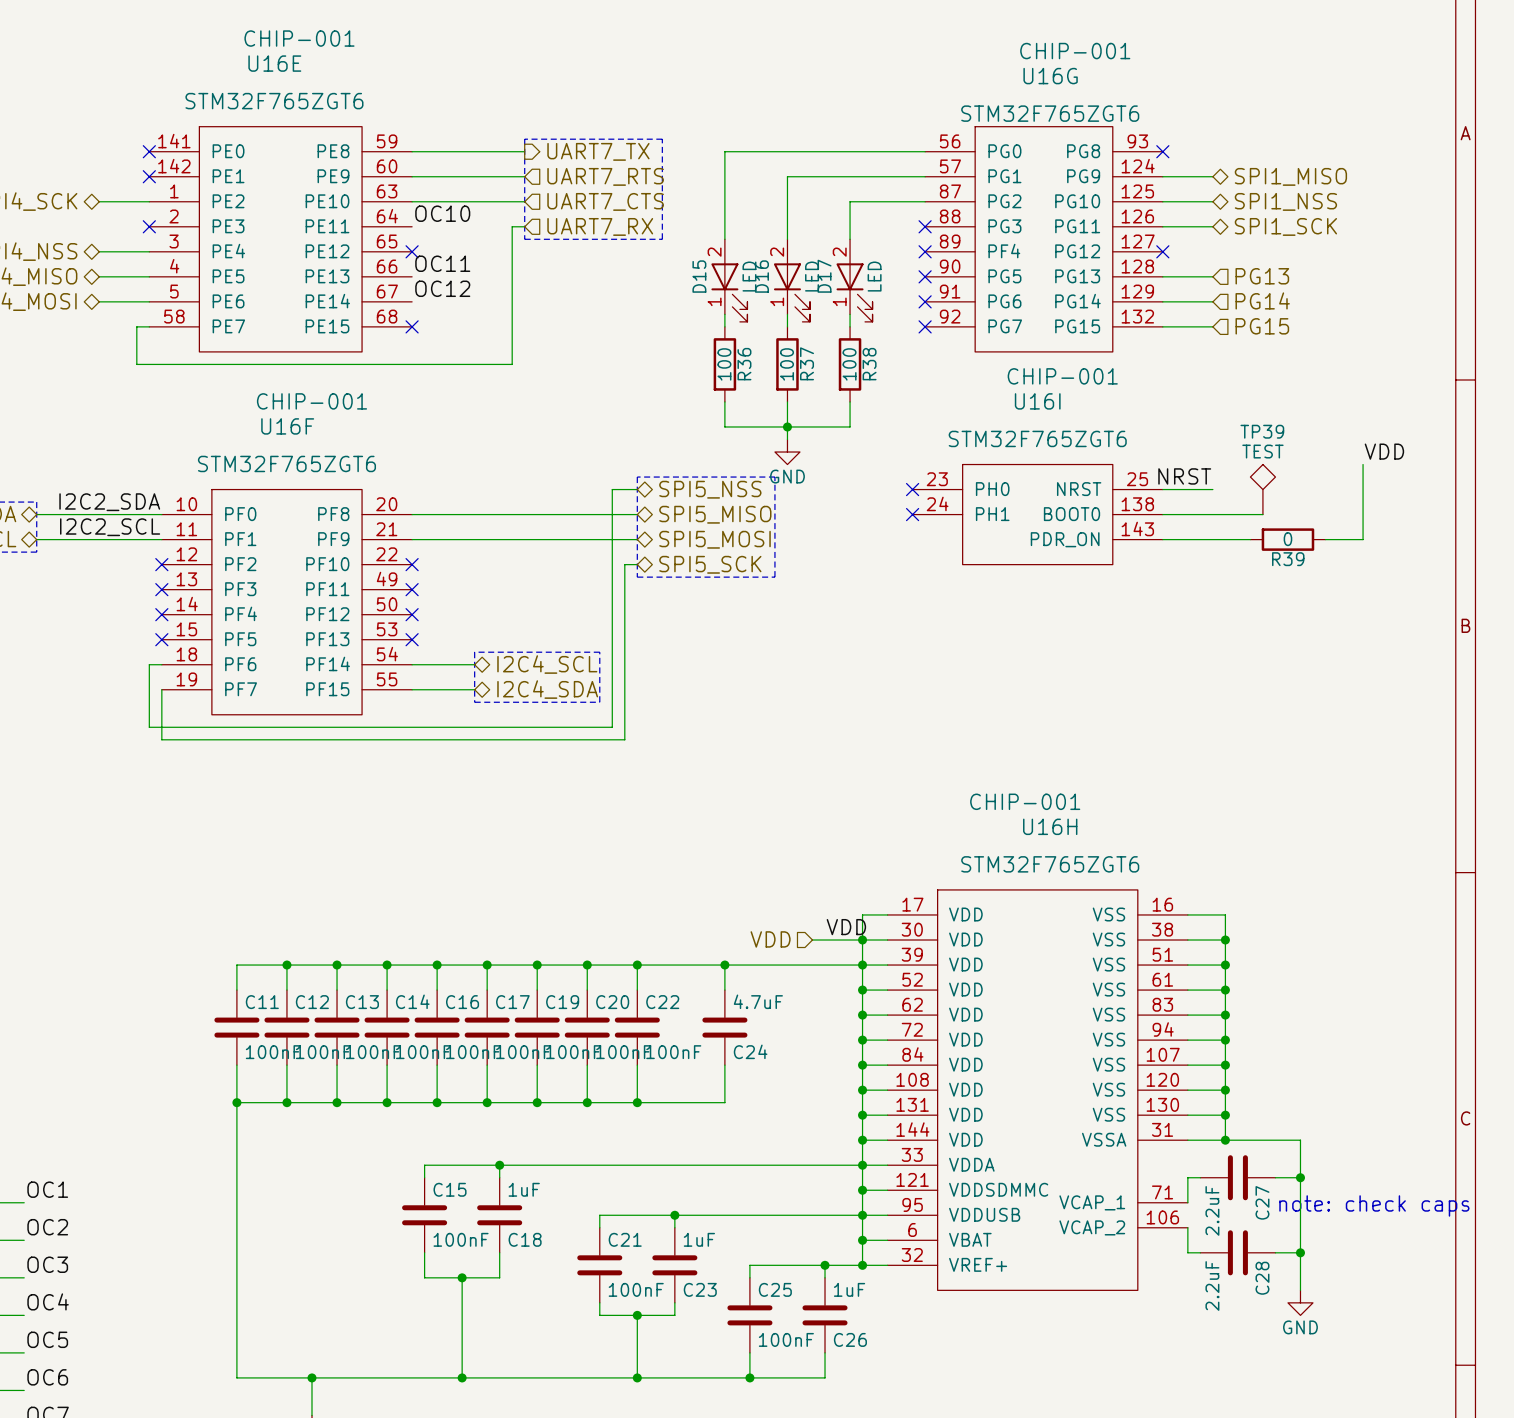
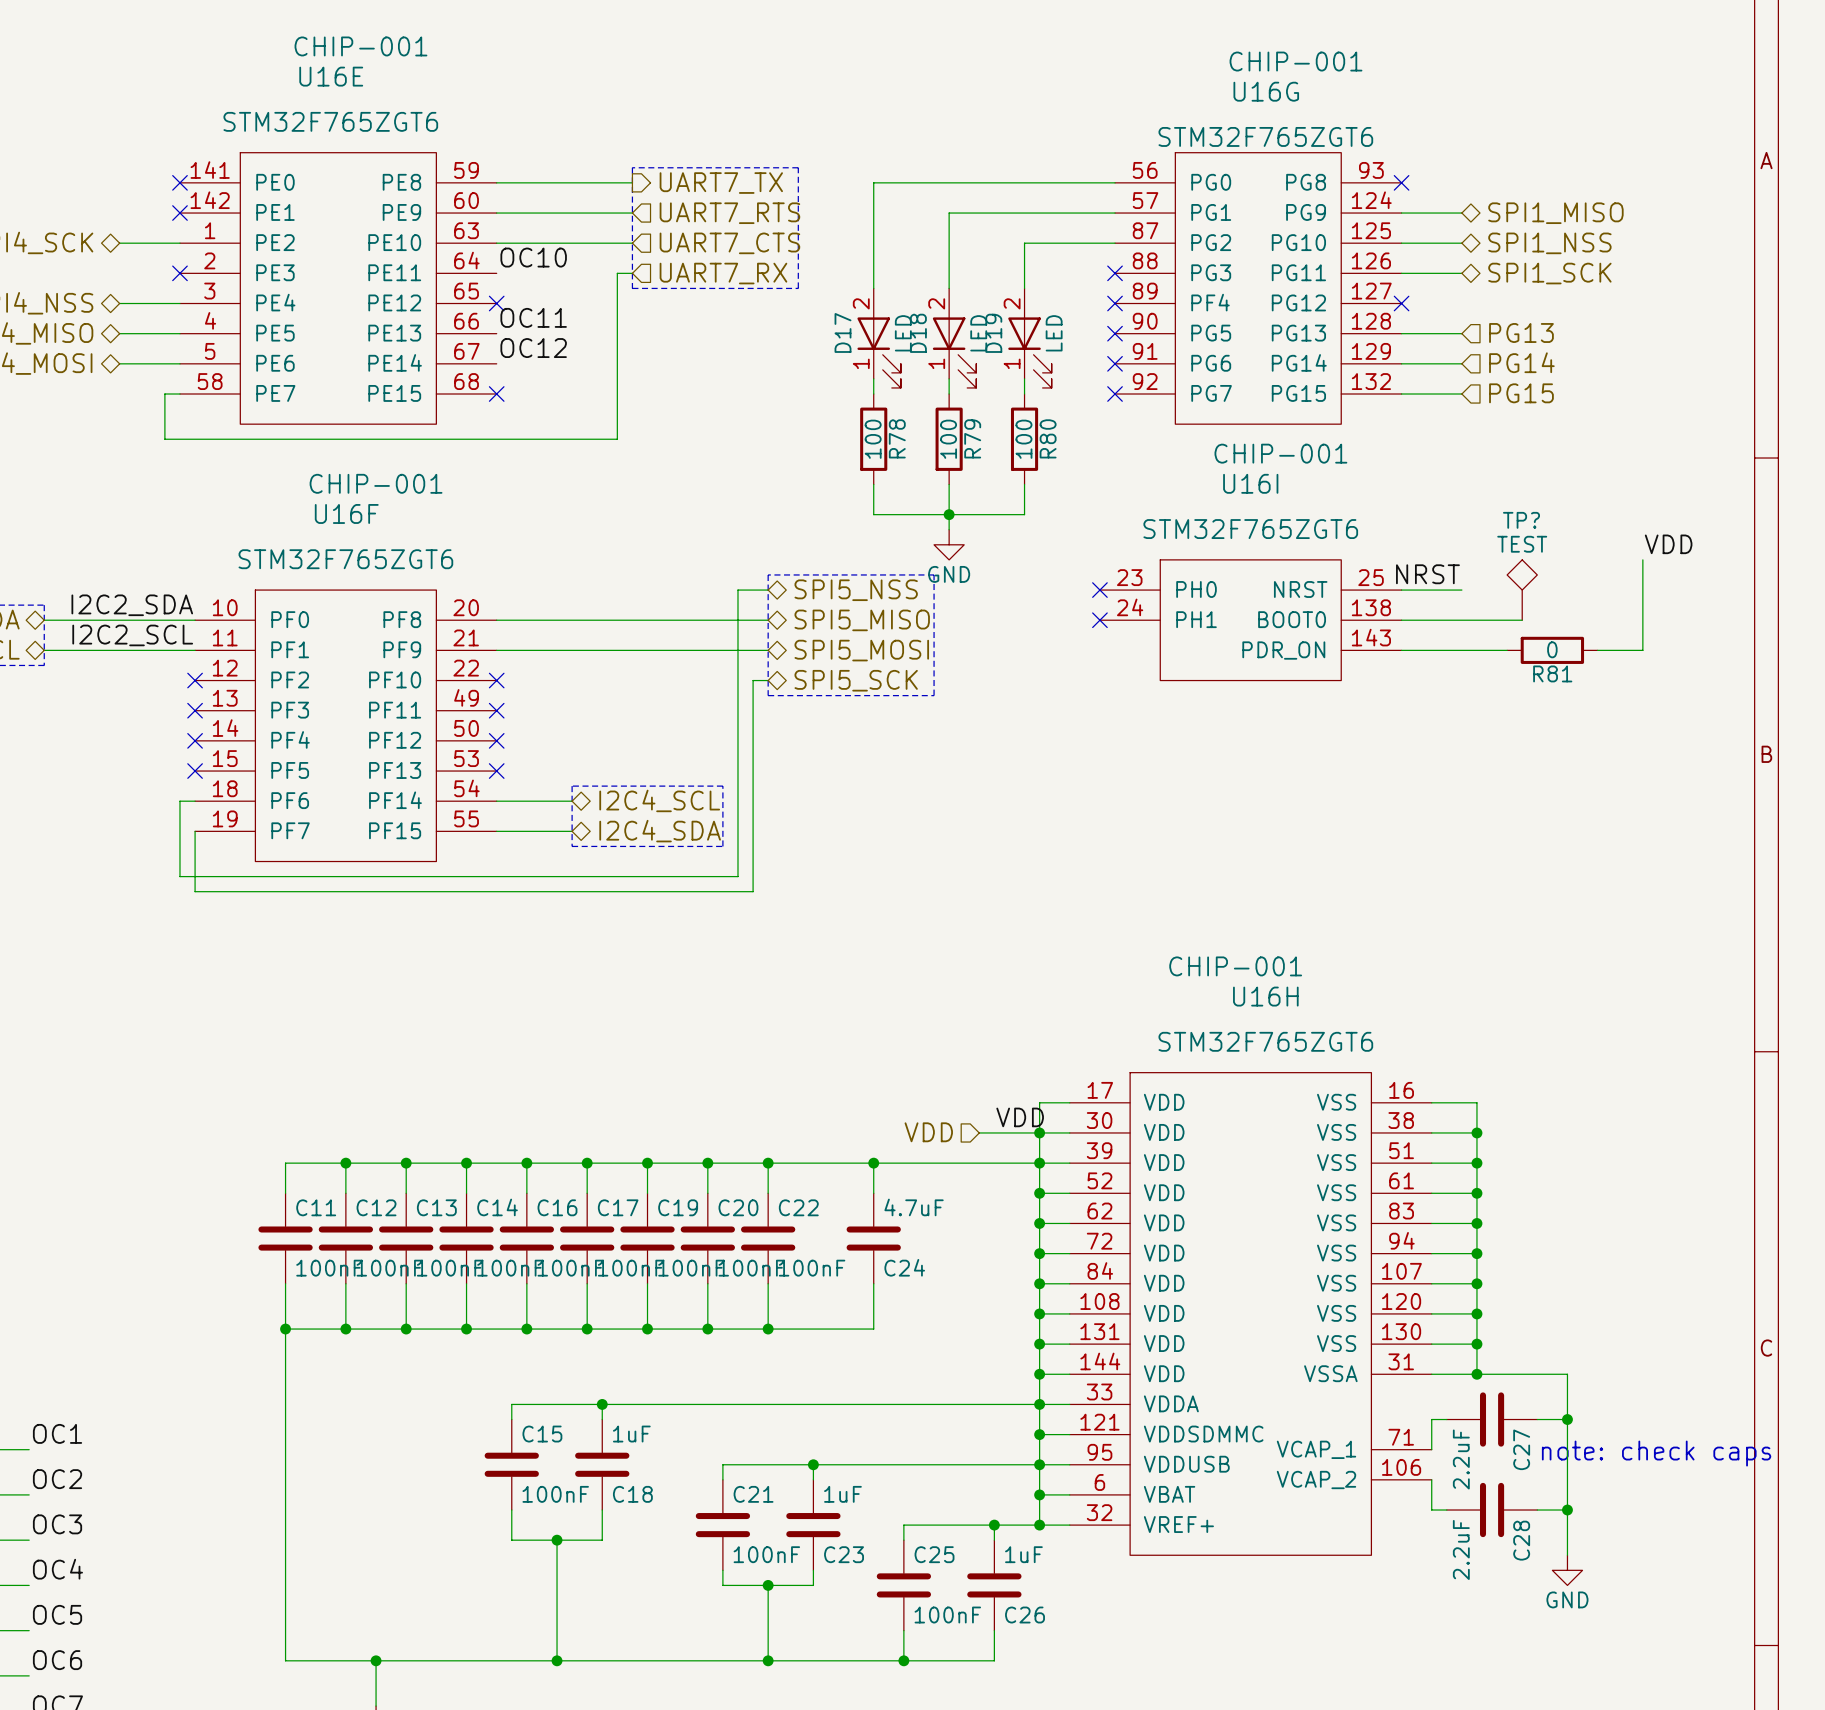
D15 name: D15 (699, 276) -> D17 (843, 332)
D16 name: D16 (761, 276) -> D18 (918, 333)
D17 name: D17 (824, 276) -> D19 (993, 333)
R37 name: R37 (807, 363) -> R79 (972, 438)
R36 name: R36 (744, 364) -> R78 (897, 438)
R38 name: R38 (869, 364) -> R80 (1048, 438)
TP39 name: TP39 (1262, 431) -> TP? (1521, 520)
R39 name: R39 (1288, 559) -> R81 (1552, 673)

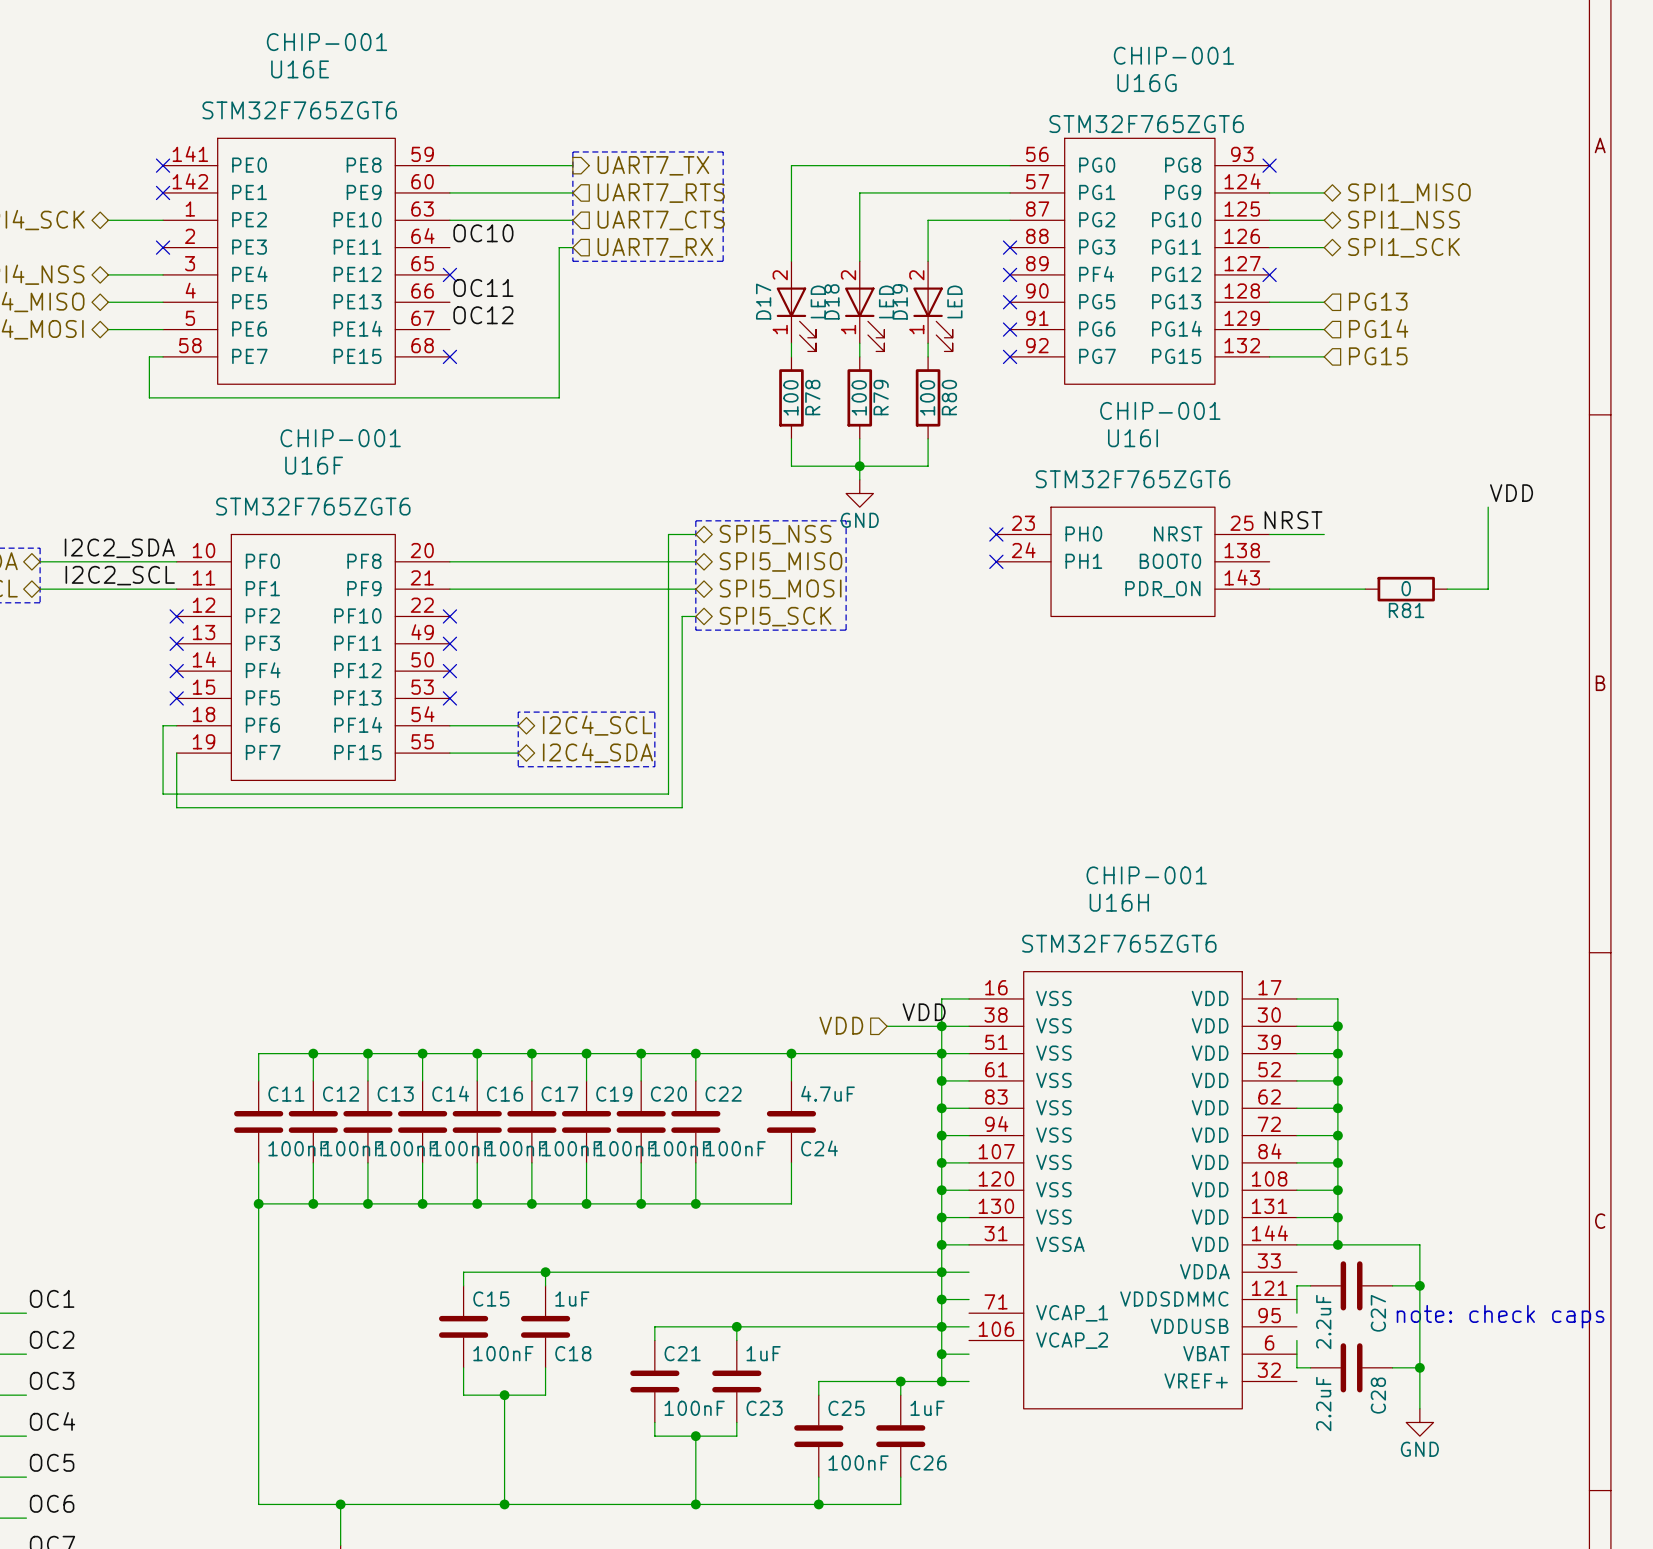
TP?: TEST (1522, 590) -> none
wire: (1401, 620) (1522, 620) -> none
U16H flip: as is (1250, 1313) -> left-right (1132, 1190)

